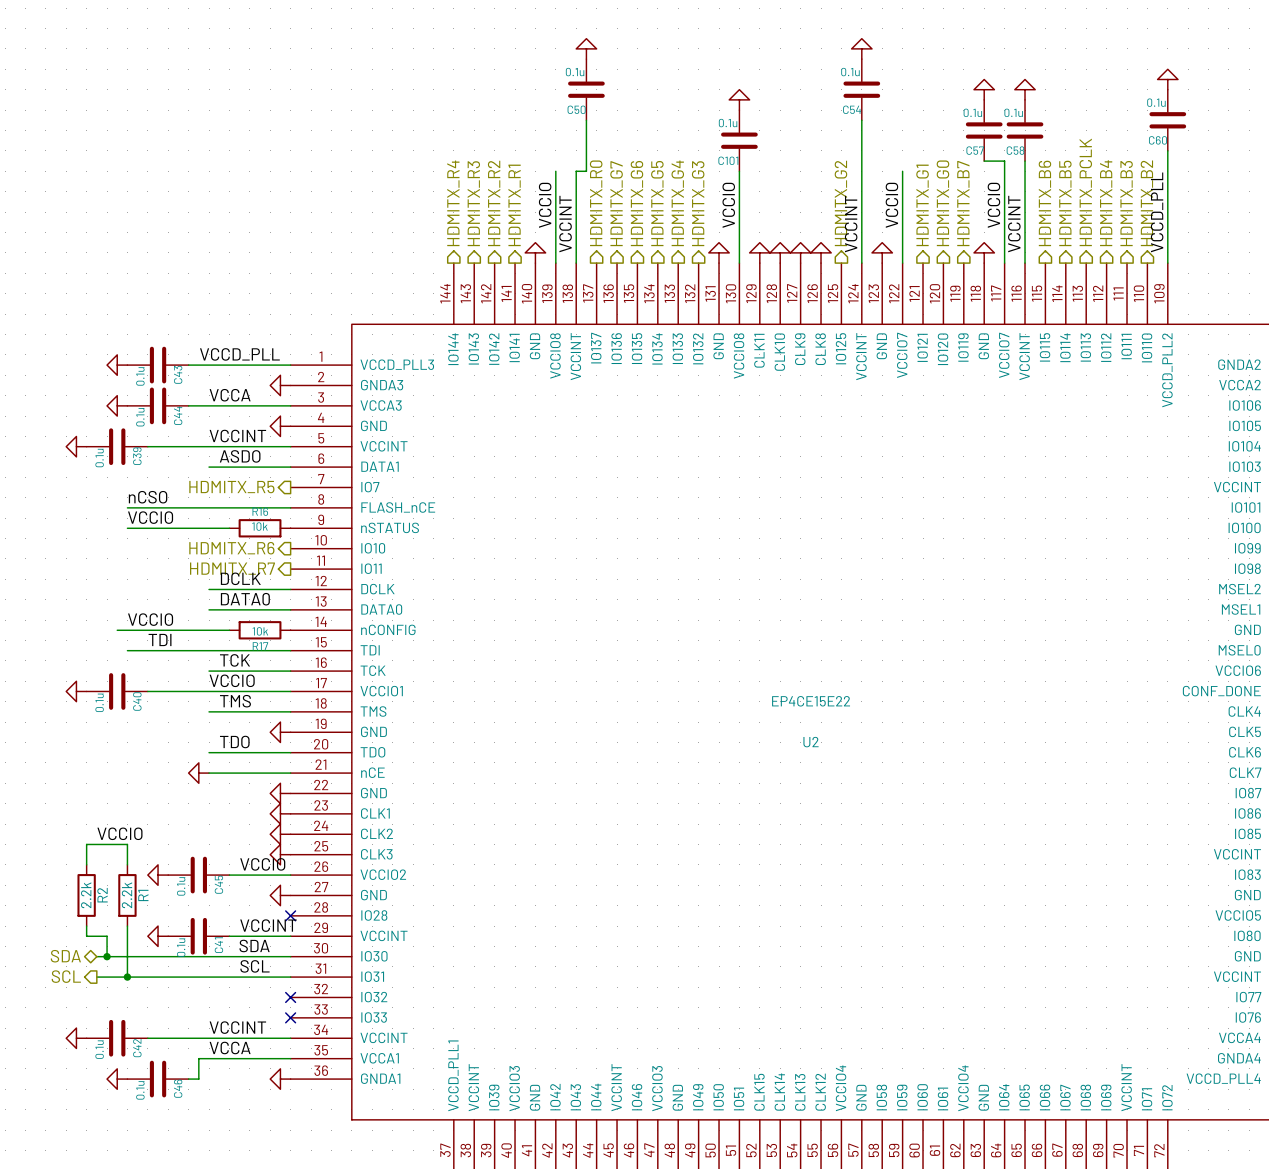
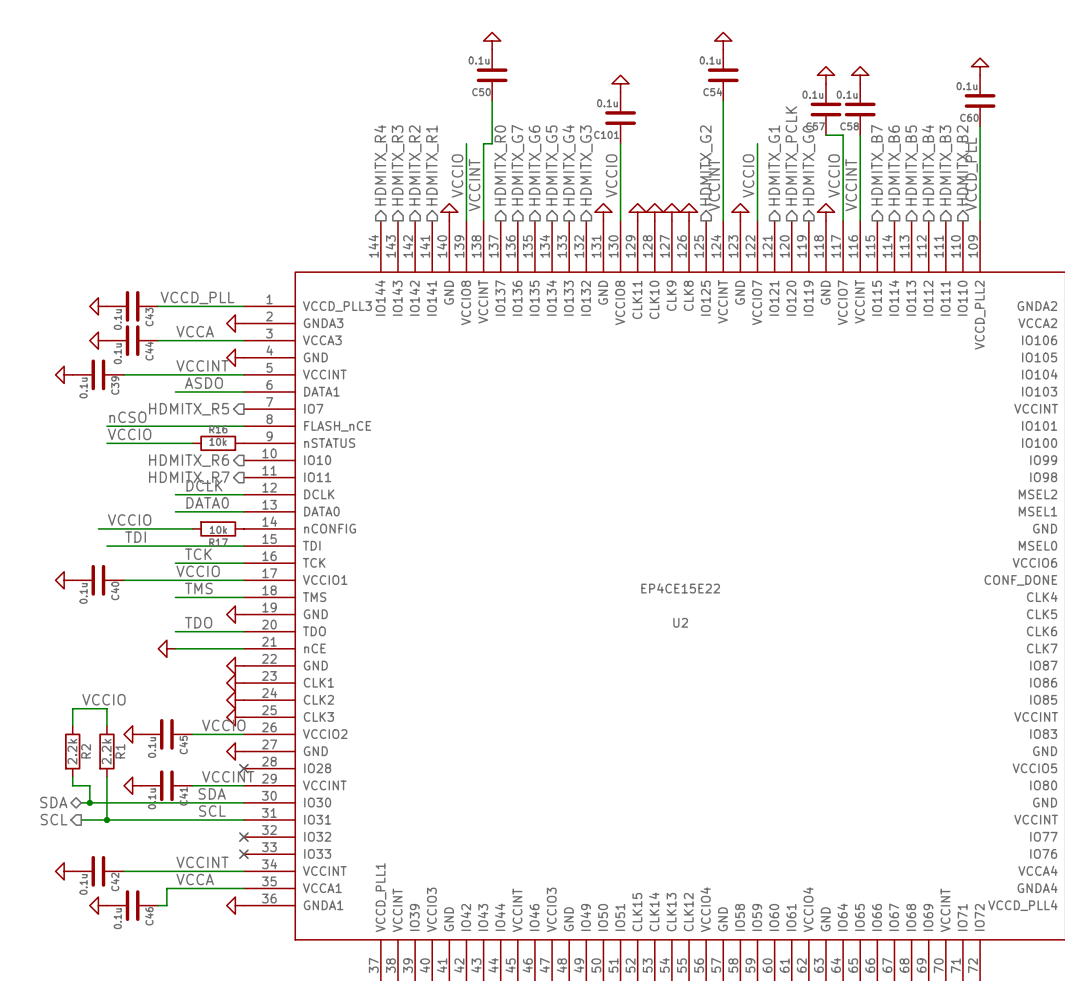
hierarchical label: HDMITX_PCLK (1085, 192) -> HDMITX_B5 (911, 165)
hierarchical label: HDMITX_G0 (942, 203) -> HDMITX_PCLK (791, 155)
hierarchical label: HDMITX_B7 (963, 203) -> HDMITX_G0 (808, 165)
hierarchical label: HDMITX_B6 (1044, 203) -> HDMITX_B7 (877, 165)
hierarchical label: HDMITX_B5 (1065, 203) -> HDMITX_B6 (894, 165)

